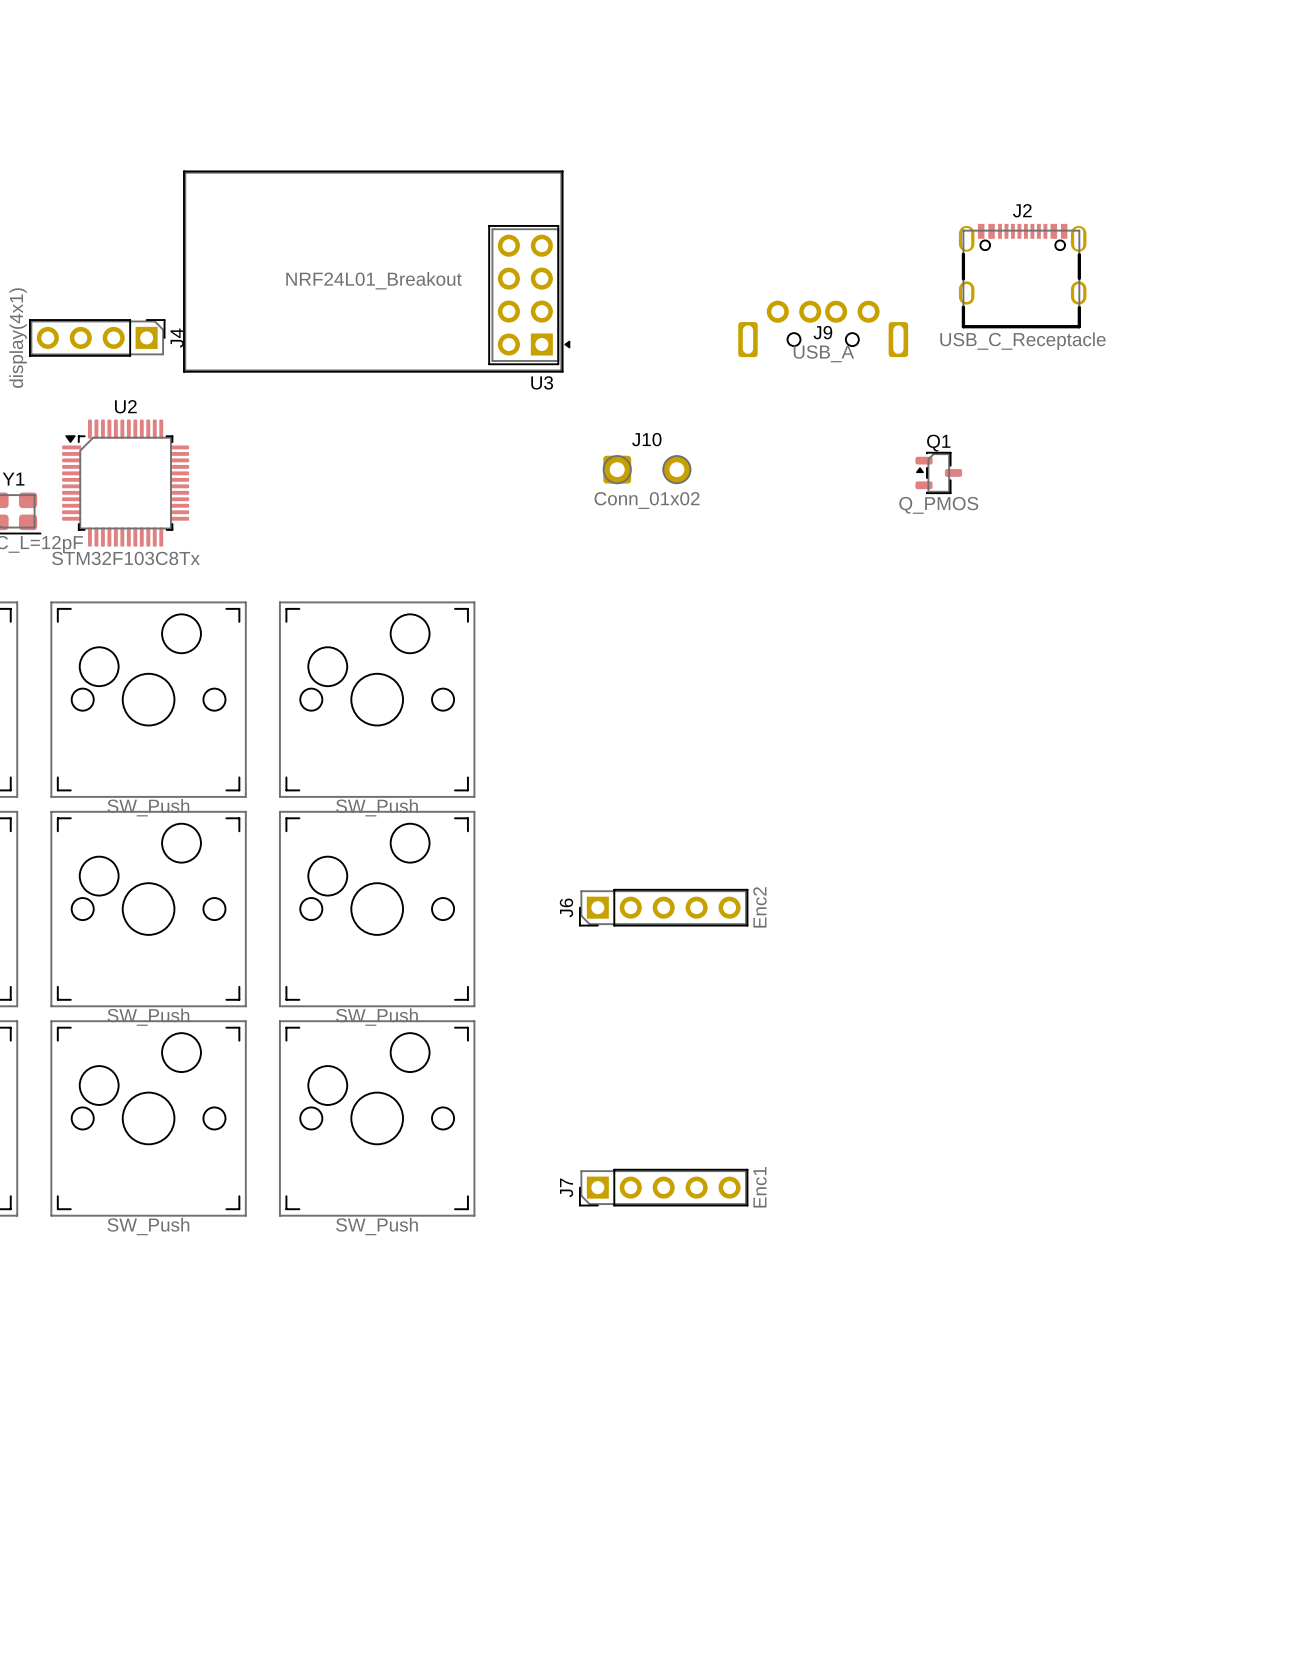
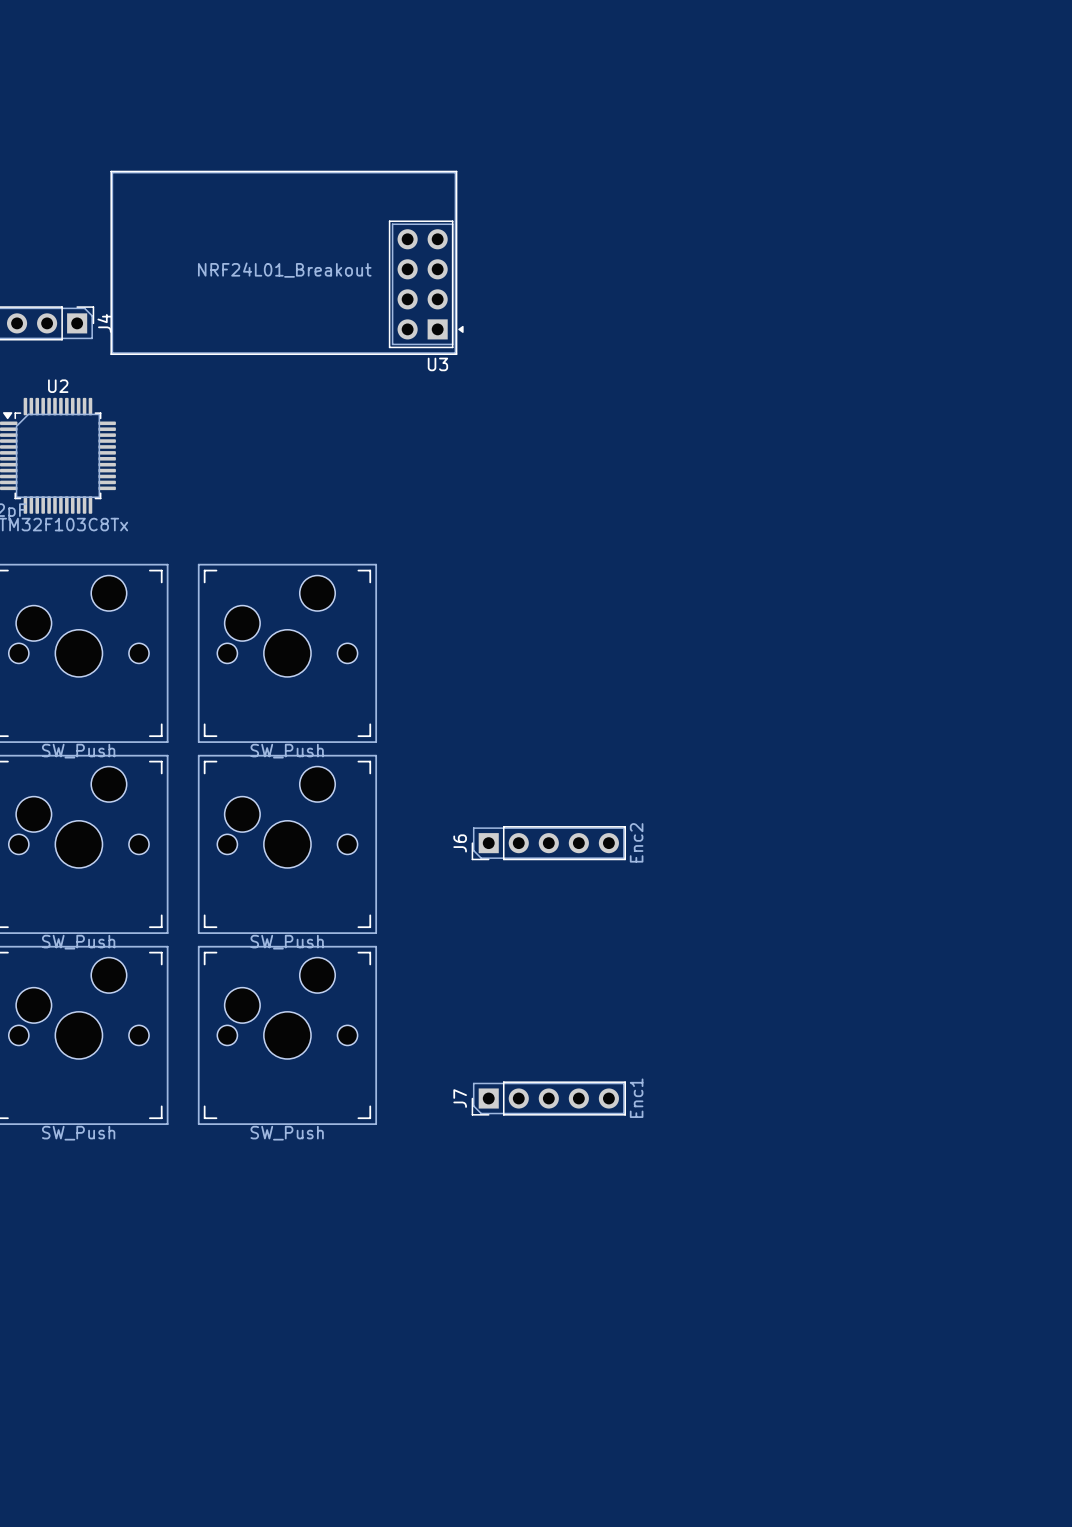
J2: USB_C_Receptacle (1022, 276) -> none
J9: USB_A (823, 328) -> none
J10: Conn_01x02 (647, 469) -> none
Q1: Q_PMOS (938, 472) -> none

